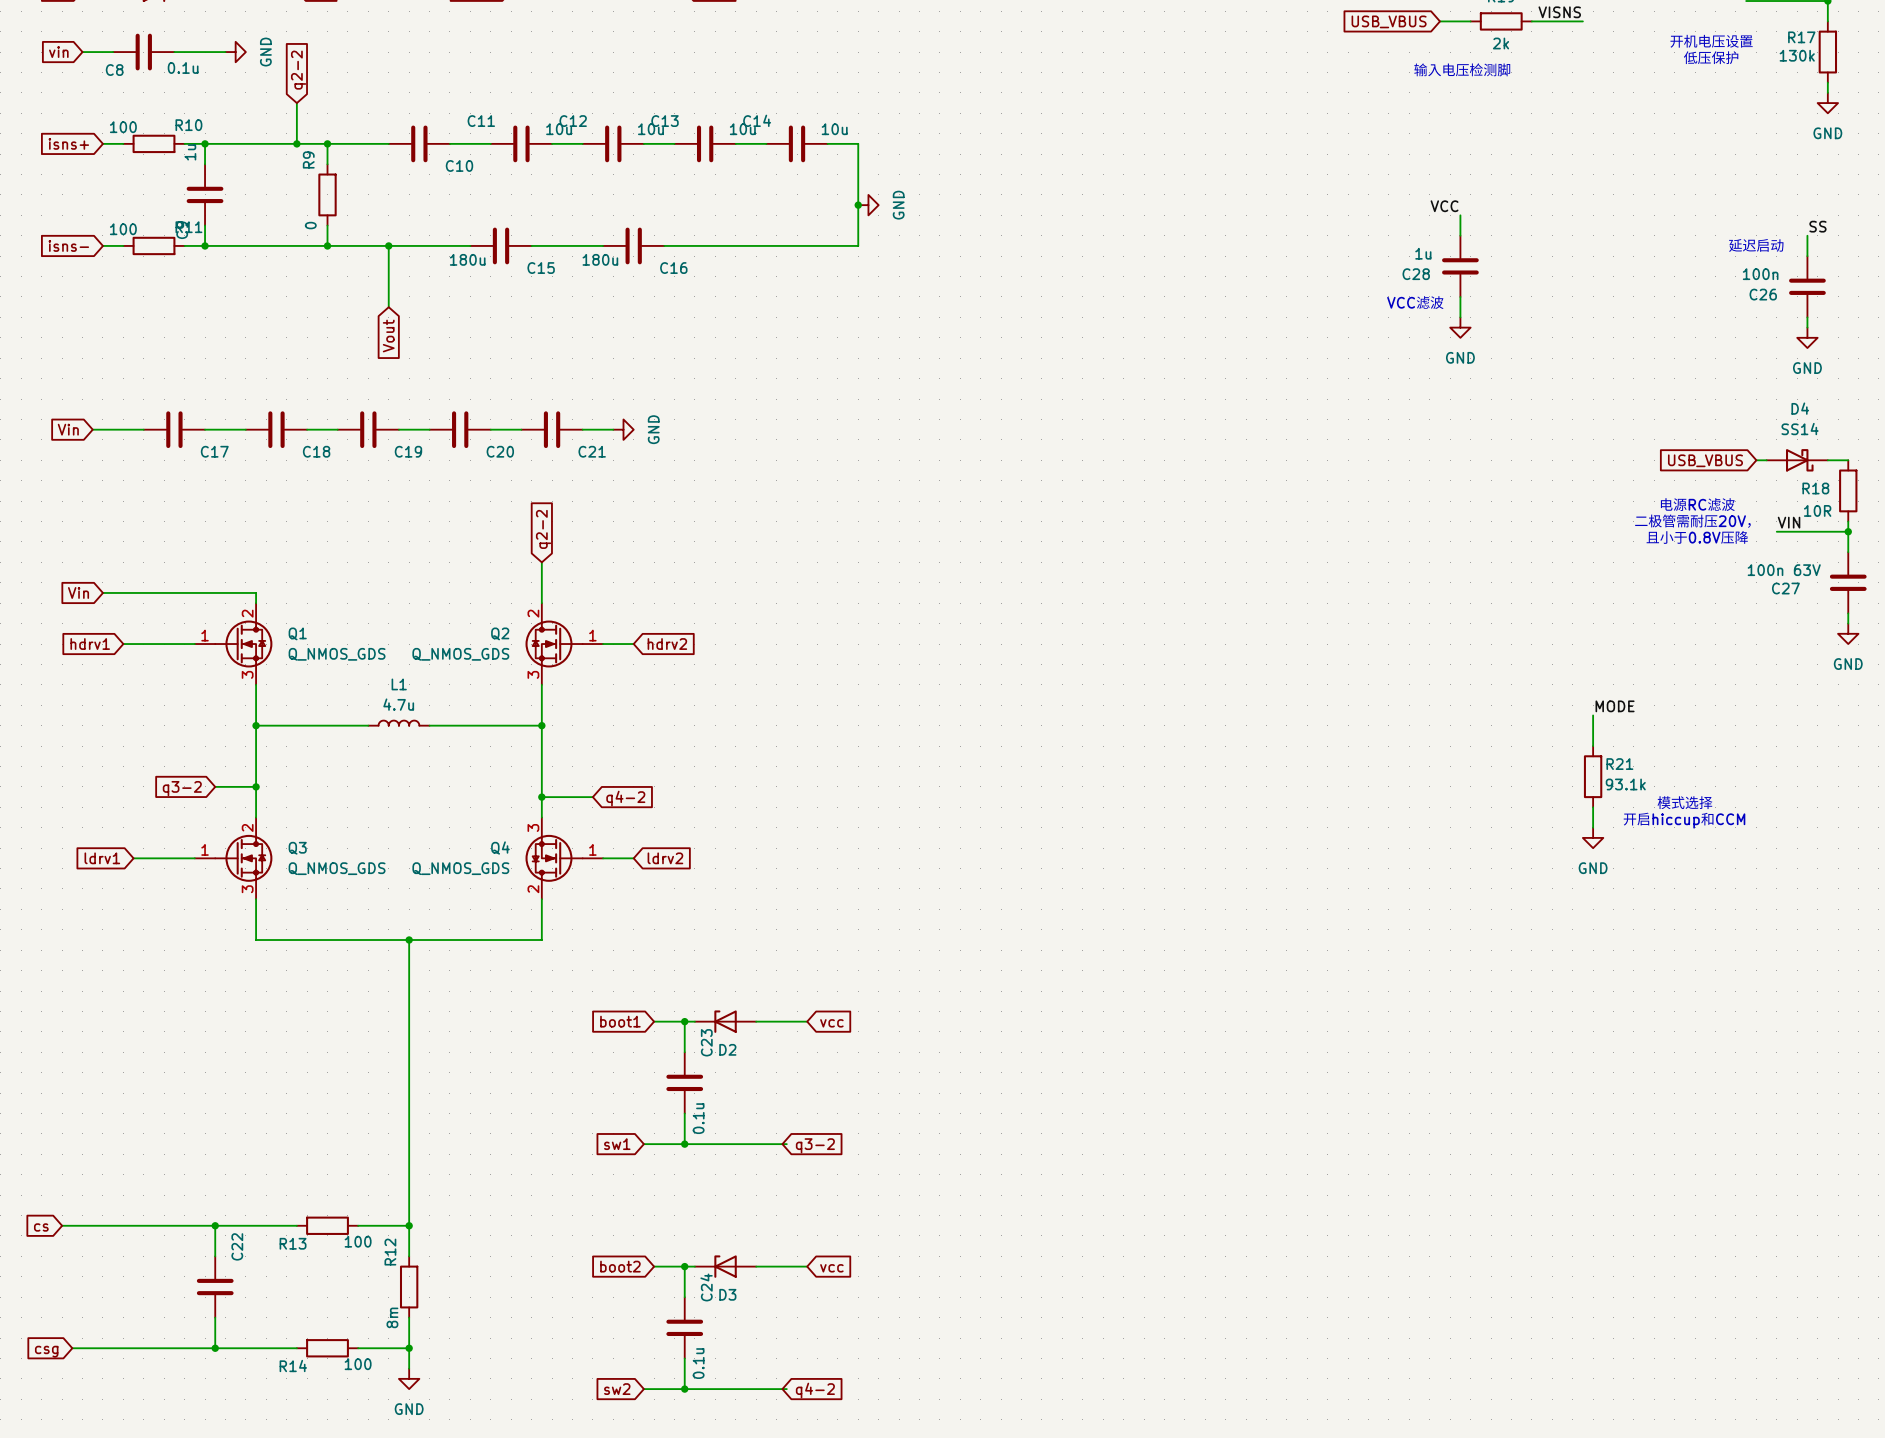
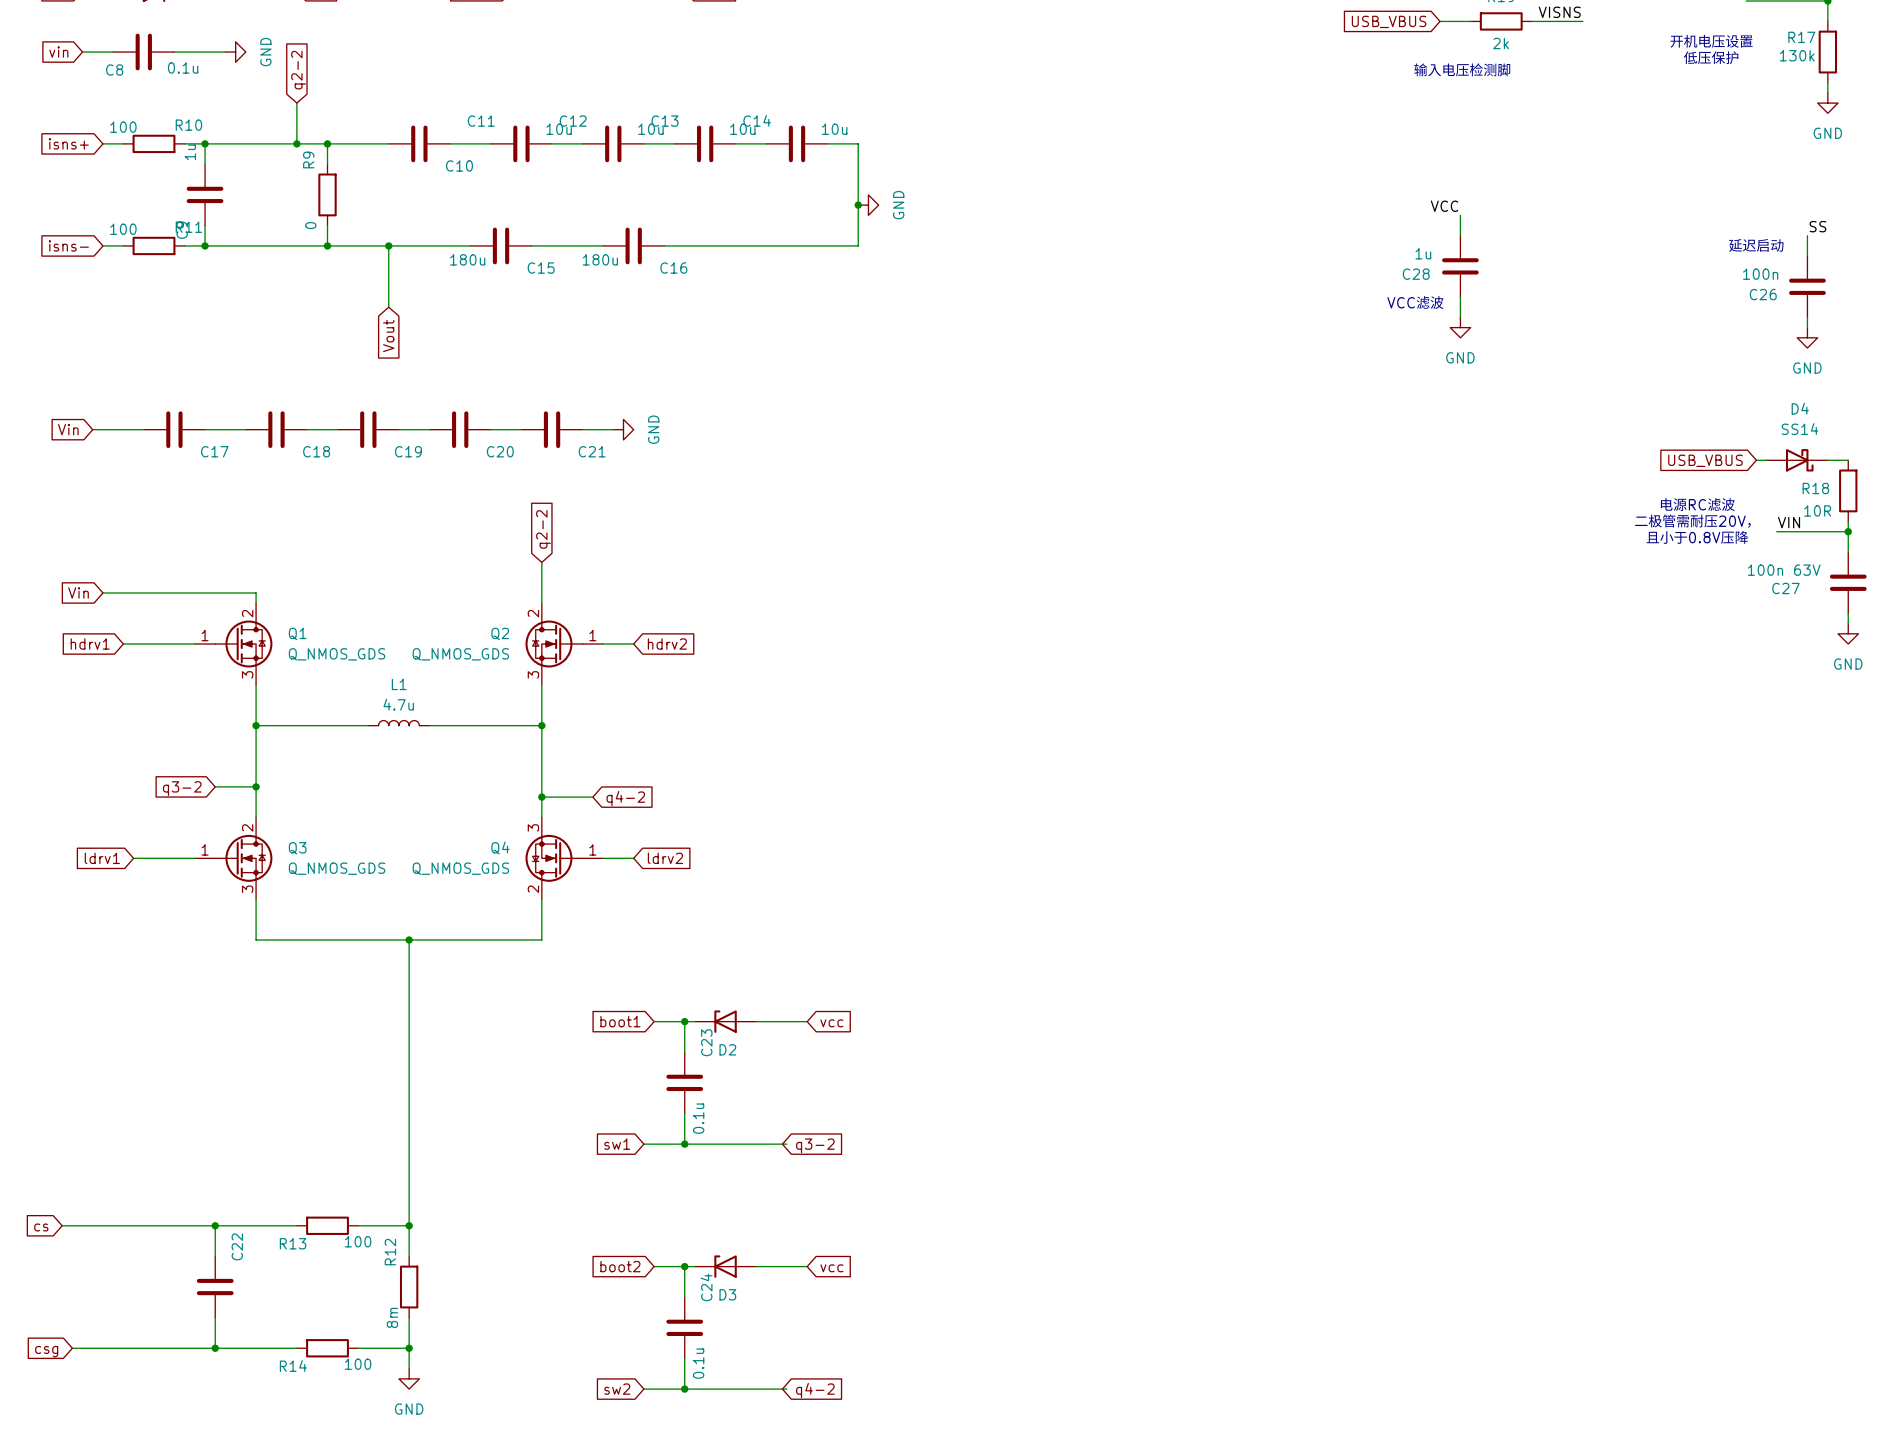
label: MODE (1615, 706) -> none
wire: (1593, 715) (1593, 746) -> none
R21: 93.1k (1593, 776) -> none
text: 模式选择 (1685, 802) -> none
wire: (1593, 807) (1593, 827) -> none
text: 开启hiccup和CCM (1684, 820) -> none
power symbol: GND (1593, 837) -> none

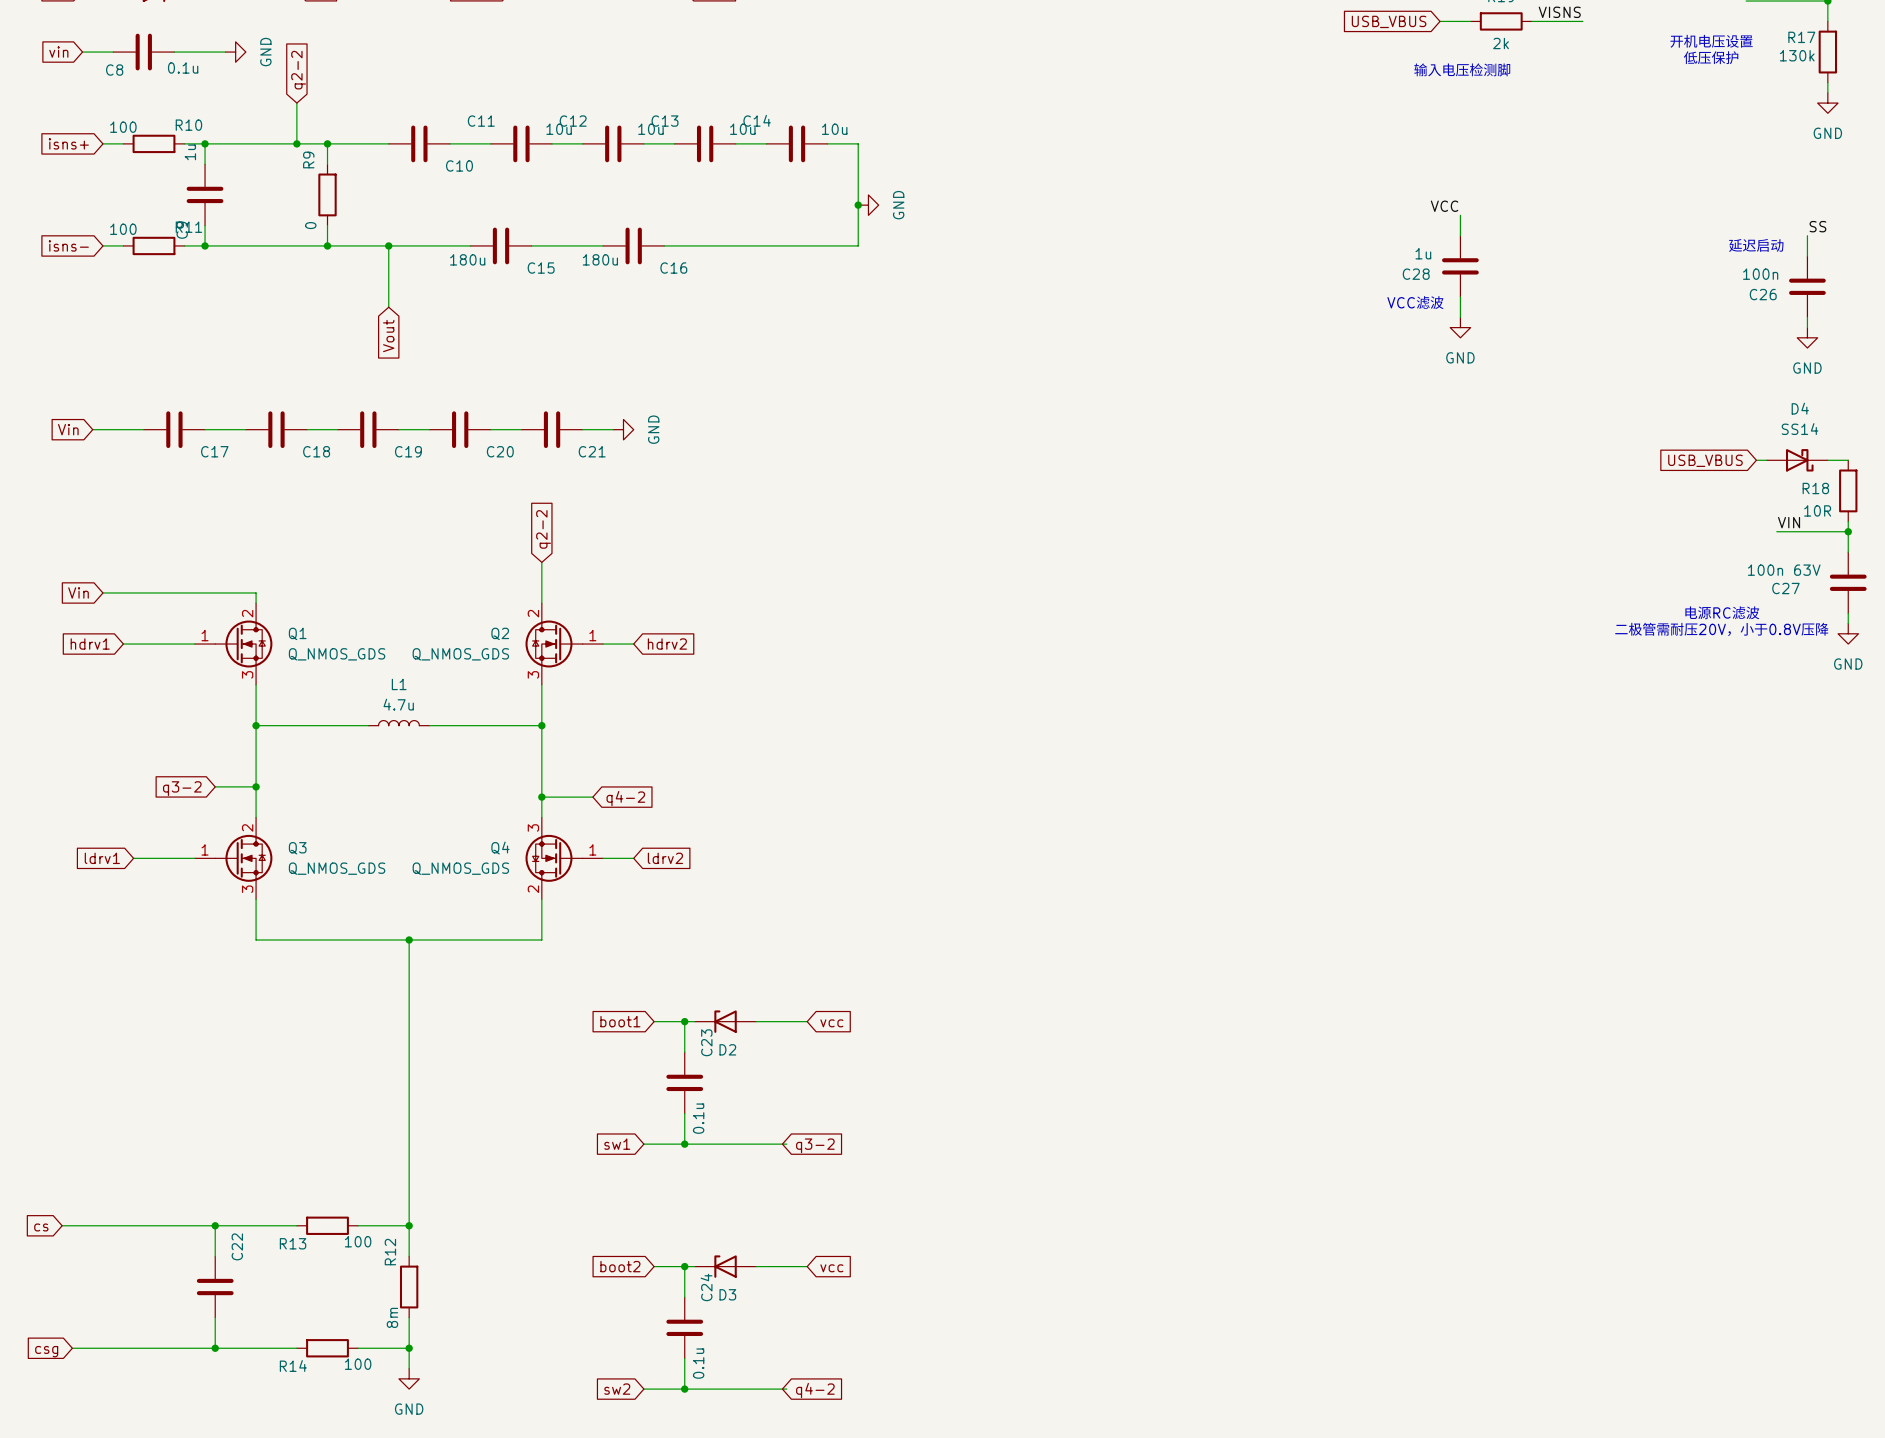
text position: 电源RC滤波 (1697, 504) -> 电源RC滤波 (1722, 612)
text: 二极管需耐压20V， (1692, 521) -> none
text: 且小于0.8V压降 (1697, 537) -> none
text: none -> 二极管需耐压20V，小于0.8V压降 (1721, 629)

